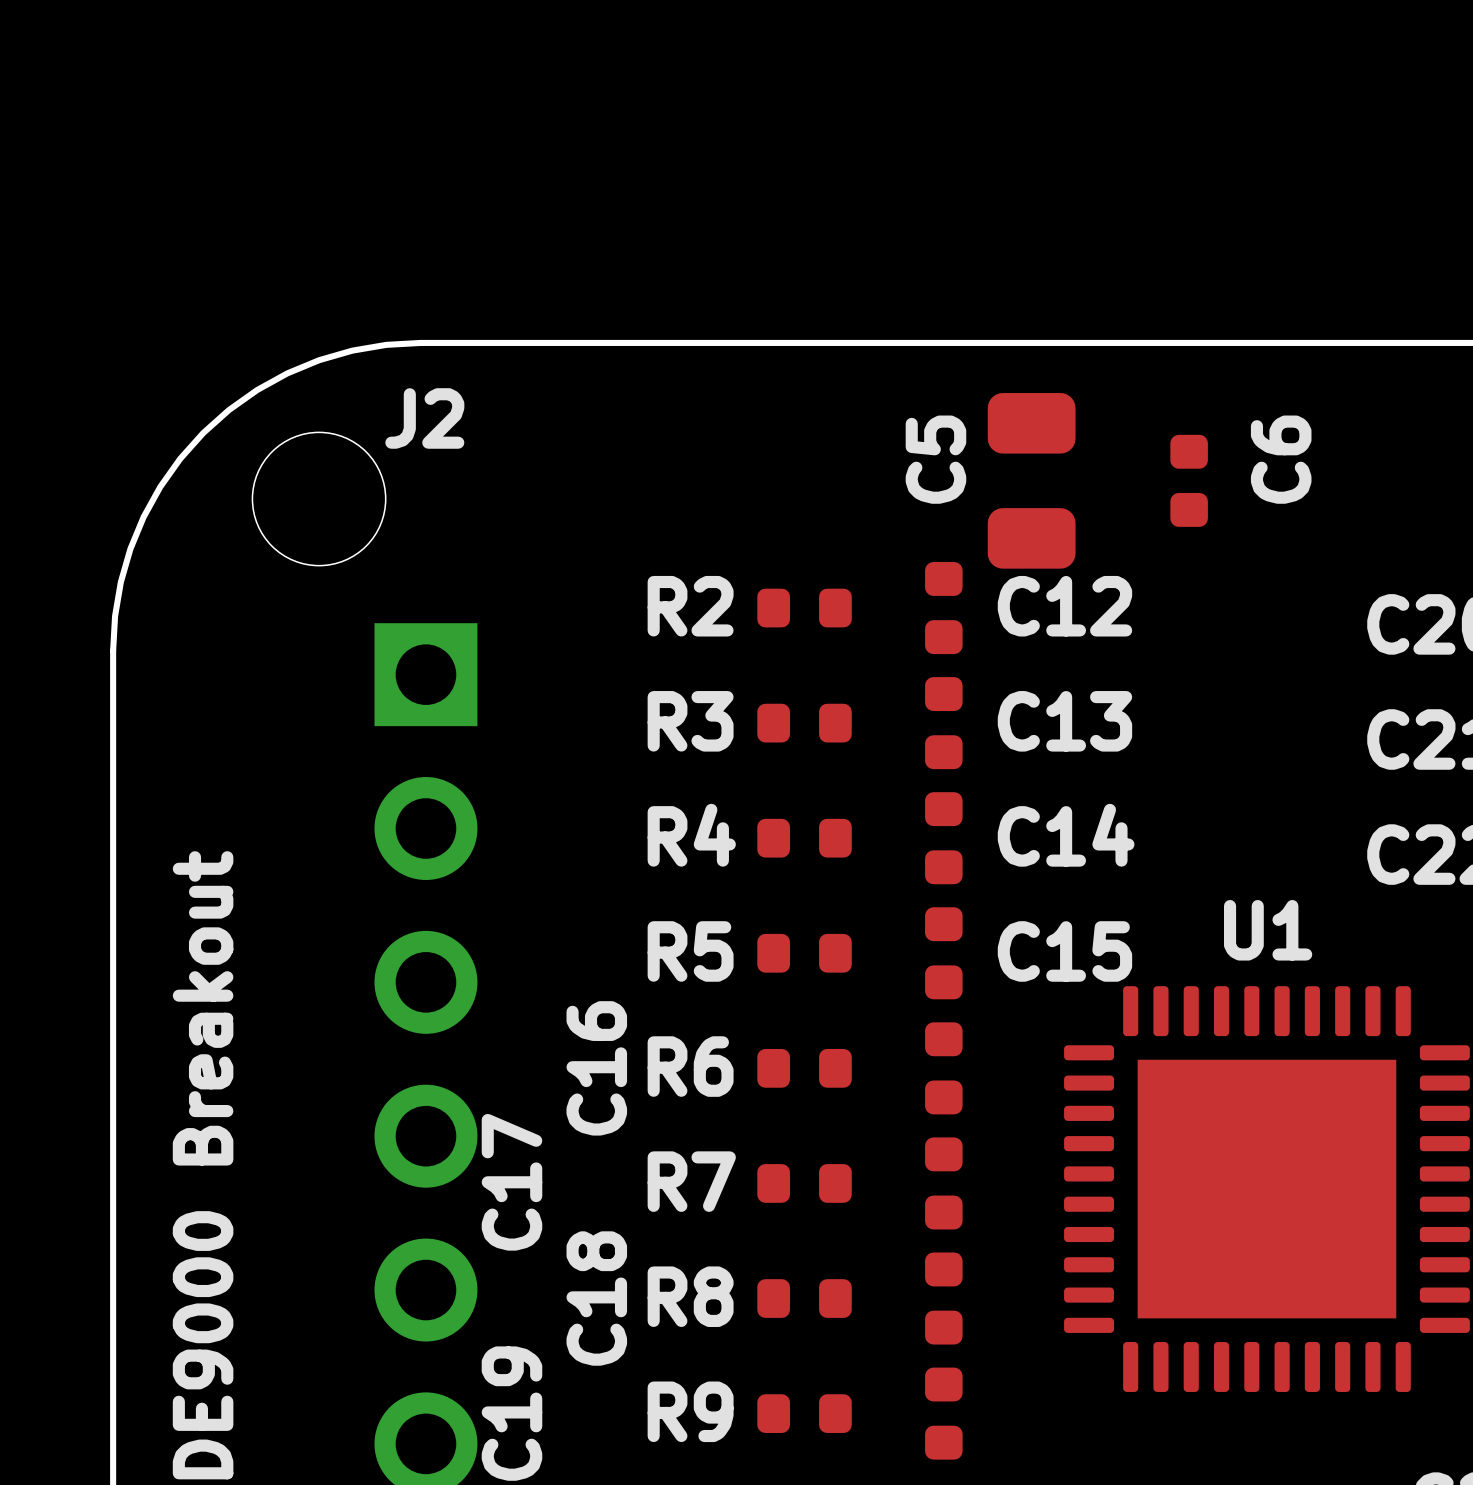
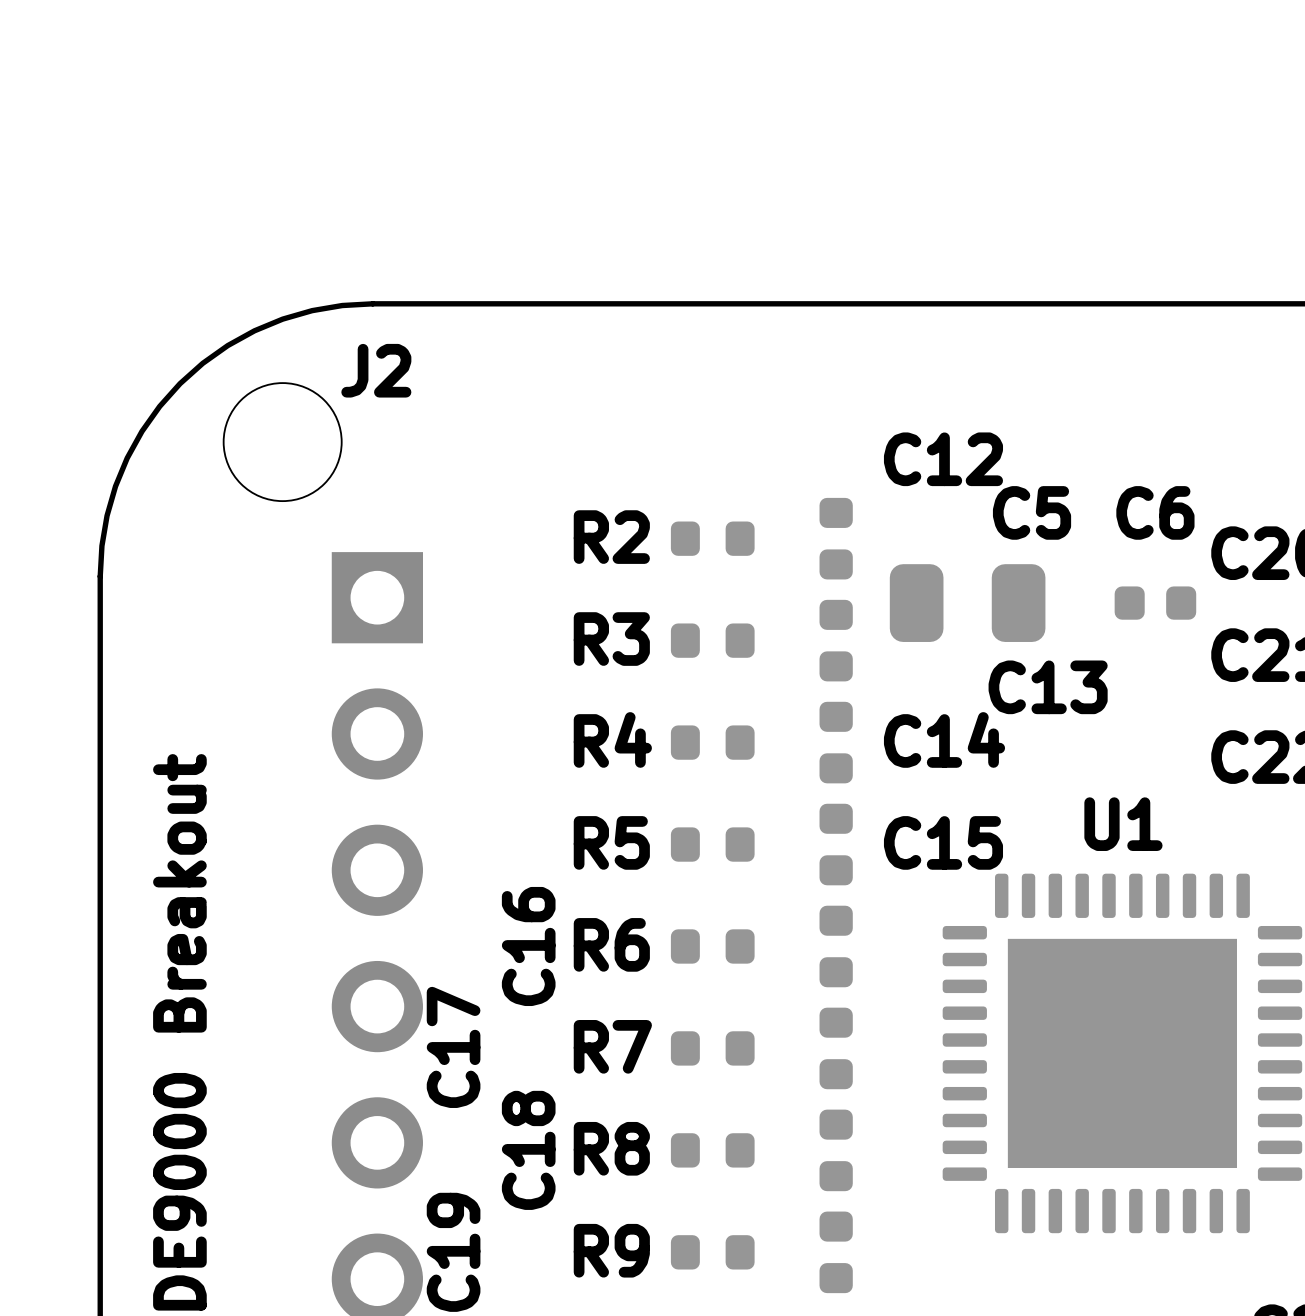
C6 name position: C6 (1281, 459) -> C6 (1155, 512)
C5 rotation: 0° (1031, 480) -> 90° clockwise (967, 603)
C5 position: (1031, 480) -> (967, 603)
C6 rotation: 0° (1189, 480) -> 90° clockwise (1155, 603)
C6 position: (1189, 480) -> (1155, 603)
C12 name position: C12 (1064, 606) -> C12 (943, 459)
C13 name position: C13 (1064, 721) -> C13 (1048, 687)

